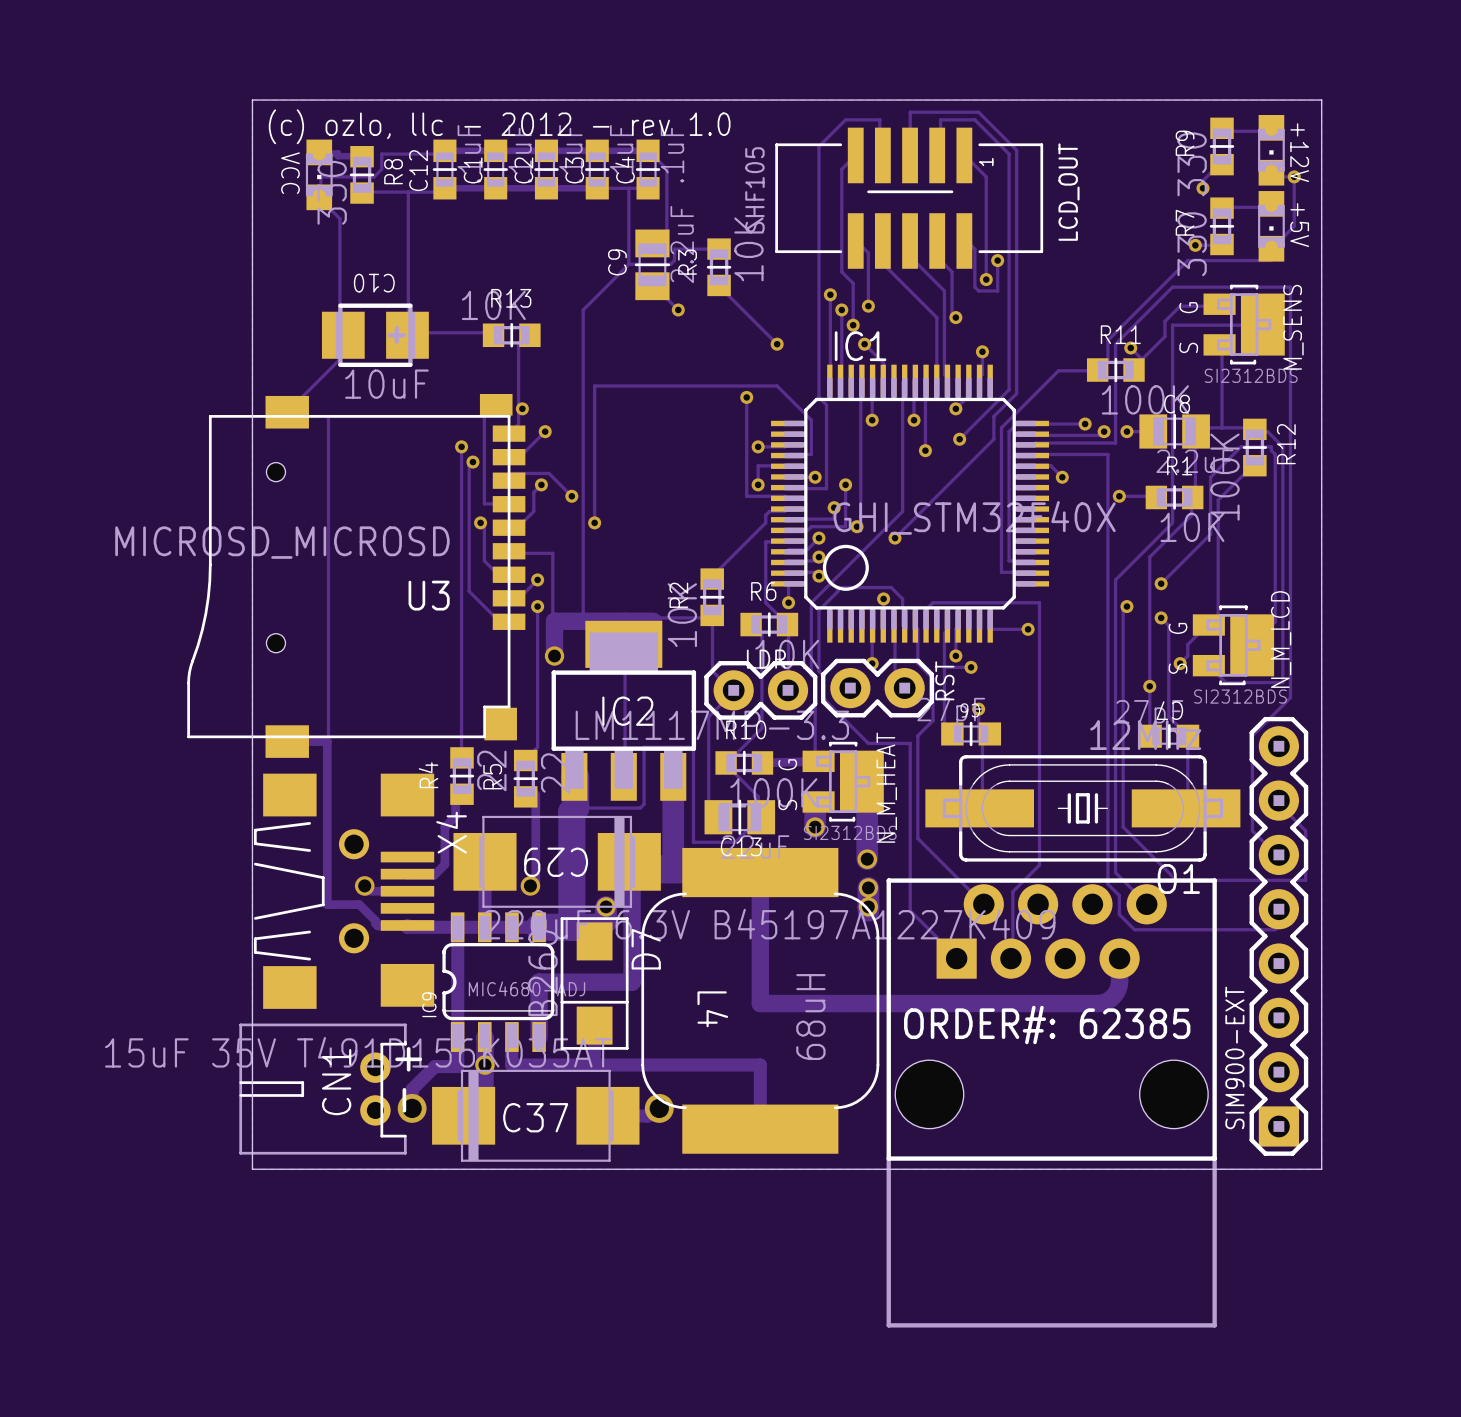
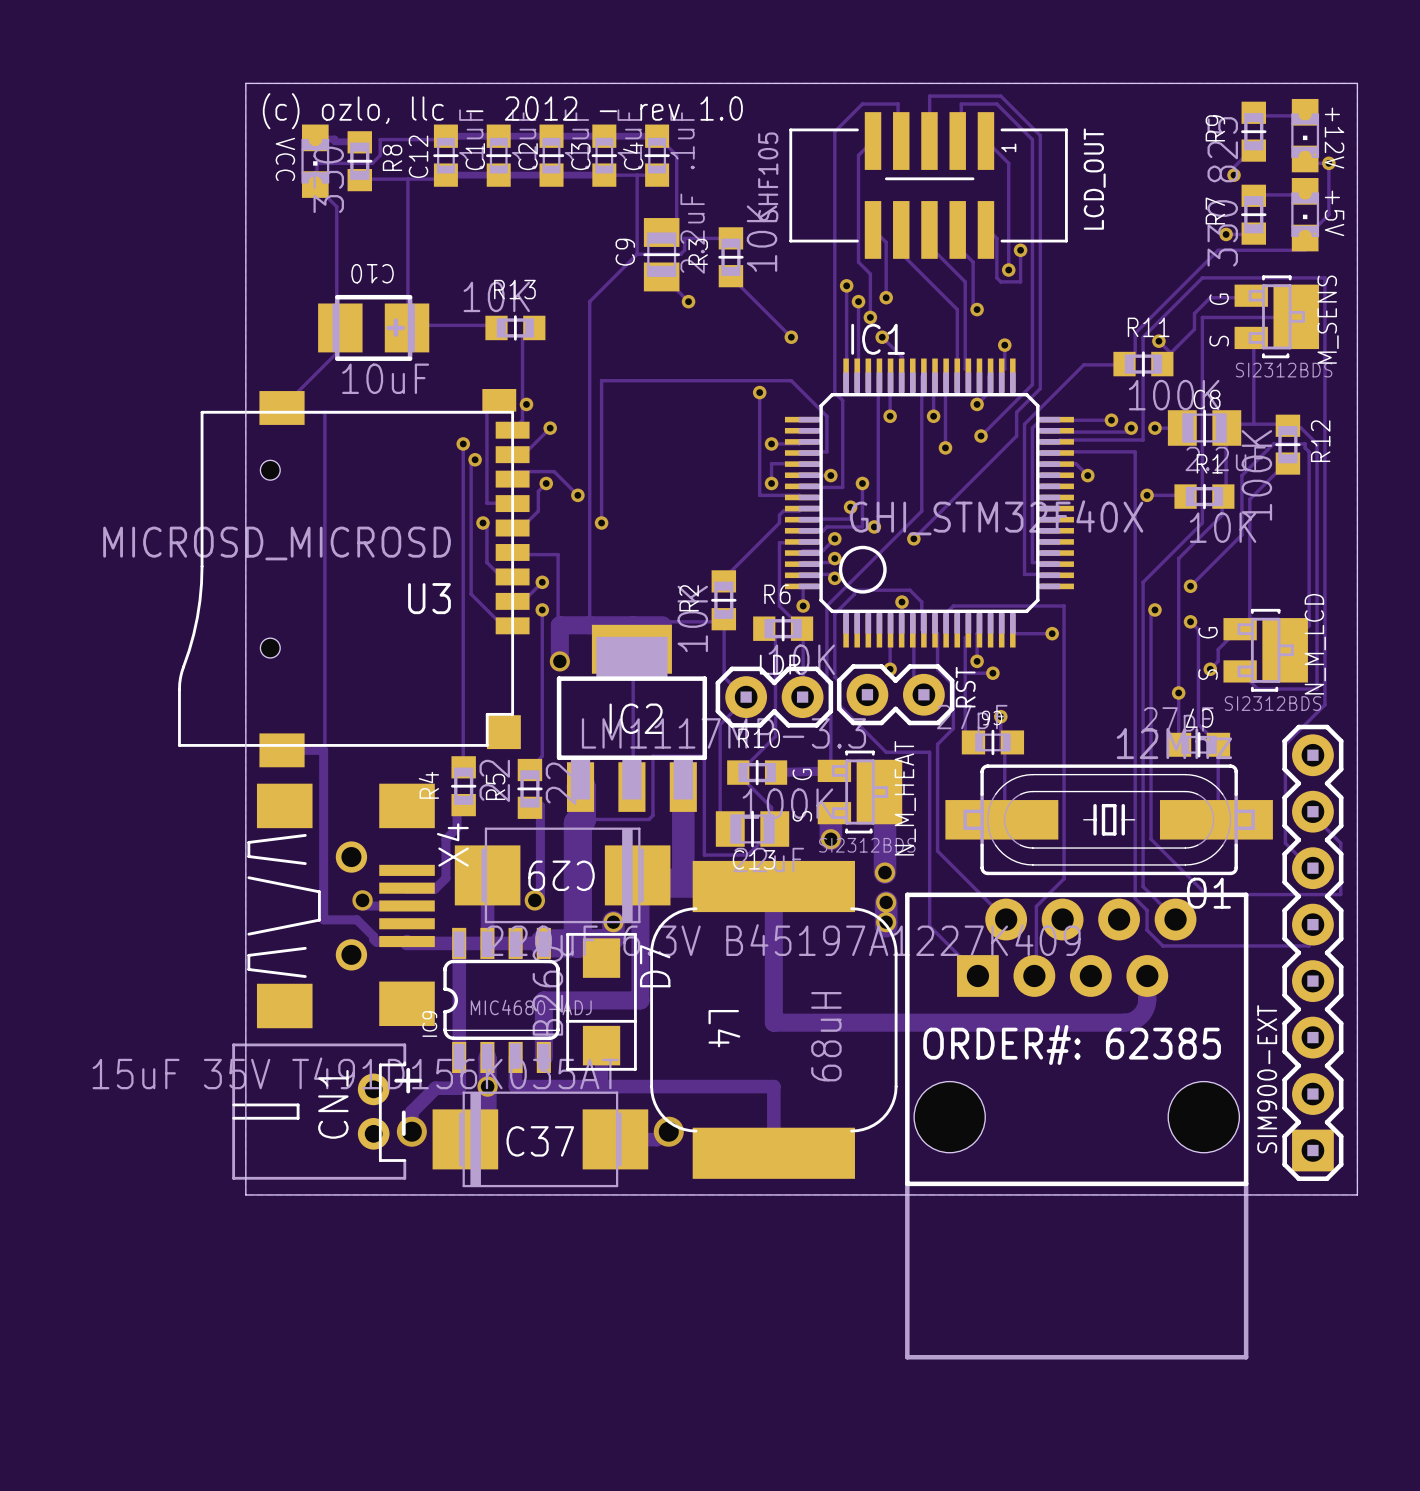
R9 value: 330 (1192, 164) -> 825 (1222, 149)

